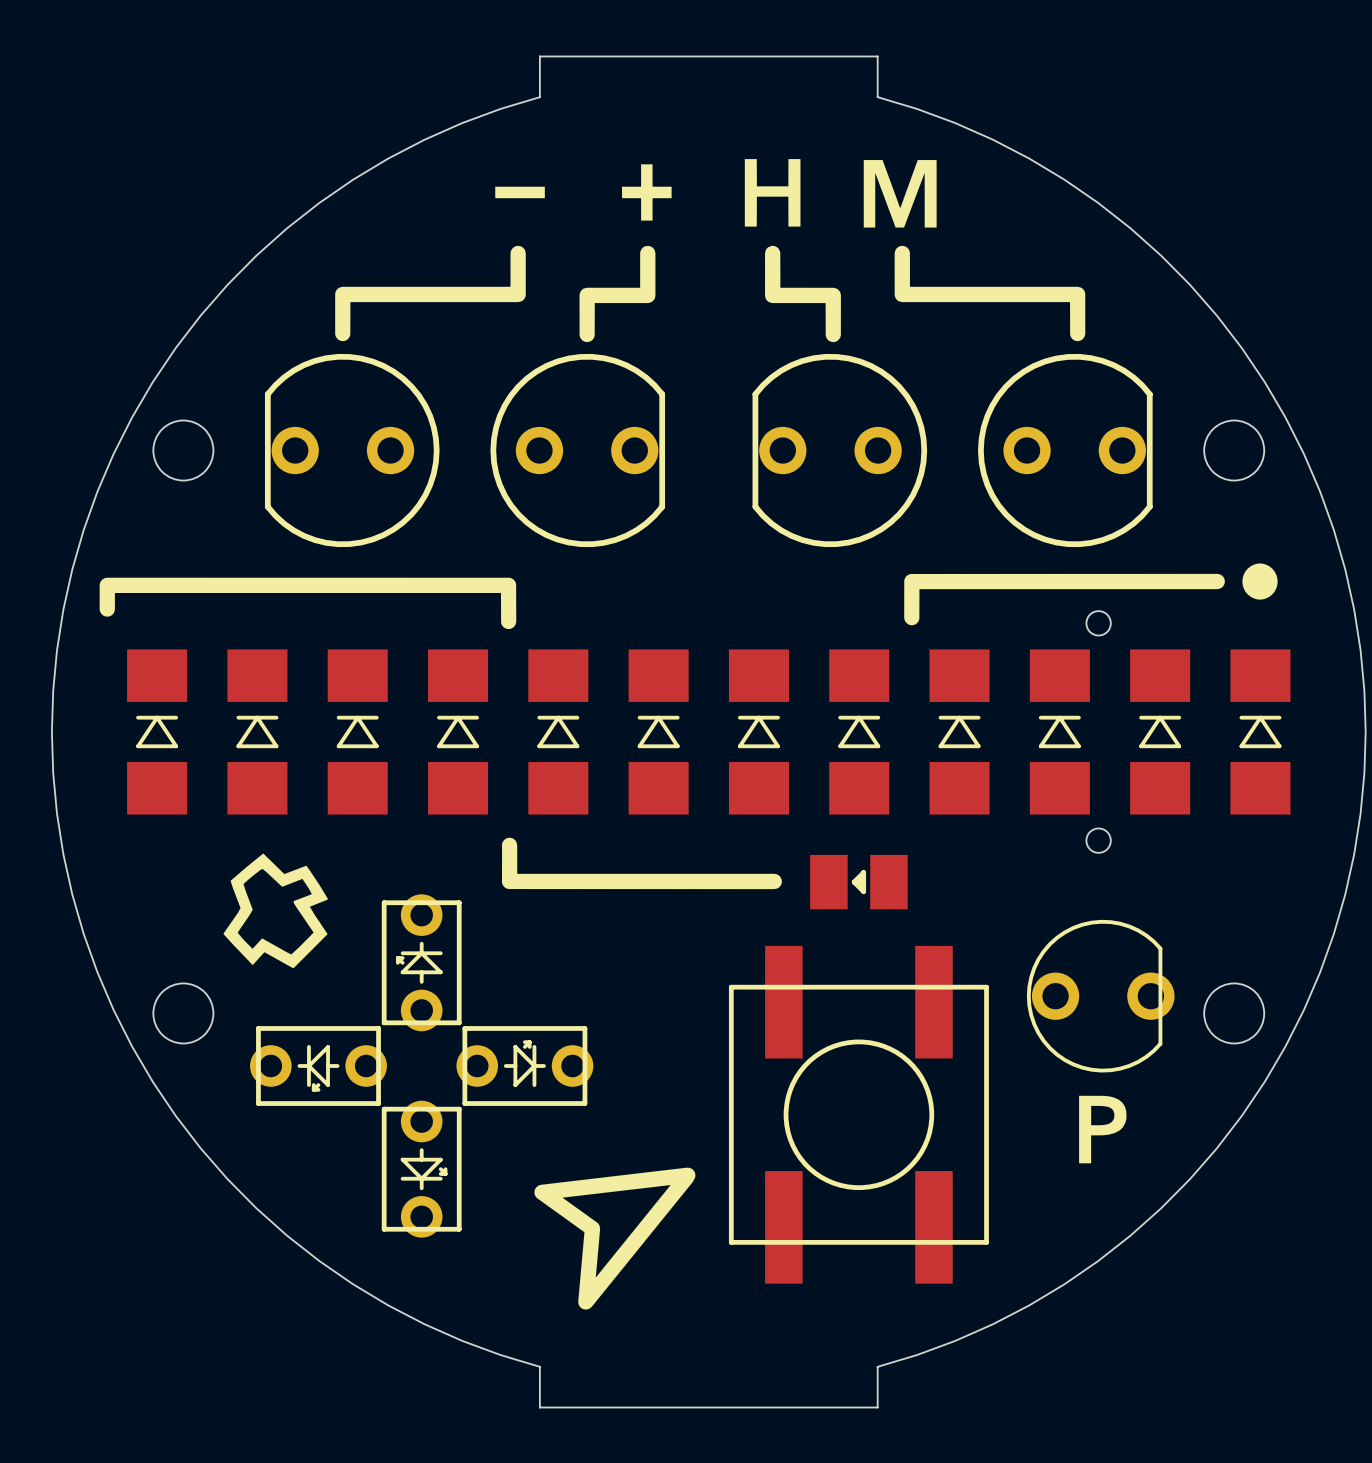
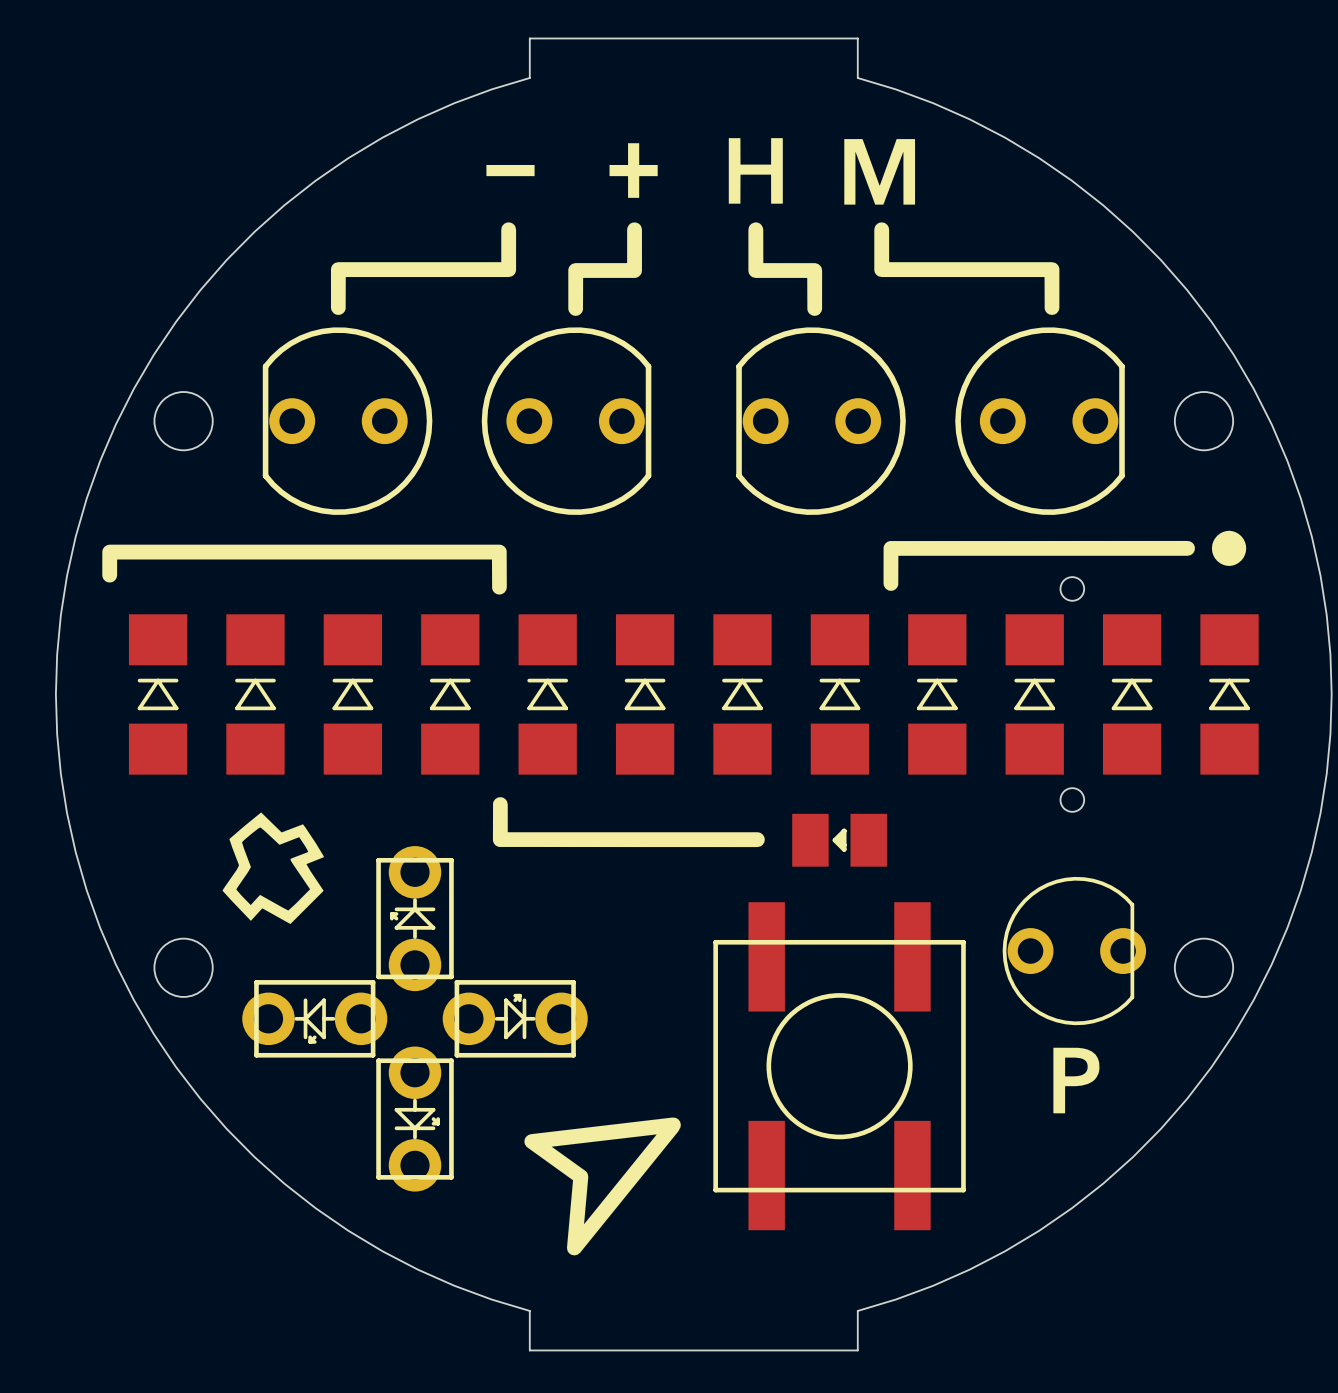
part footprint: [381, 894, 462, 1032] -> [376, 846, 454, 992]
part footprint: [250, 1026, 387, 1106] -> [242, 980, 388, 1058]
part footprint: [456, 1026, 594, 1106] -> [442, 980, 588, 1058]
part footprint: [381, 1100, 462, 1238] -> [376, 1046, 454, 1192]

